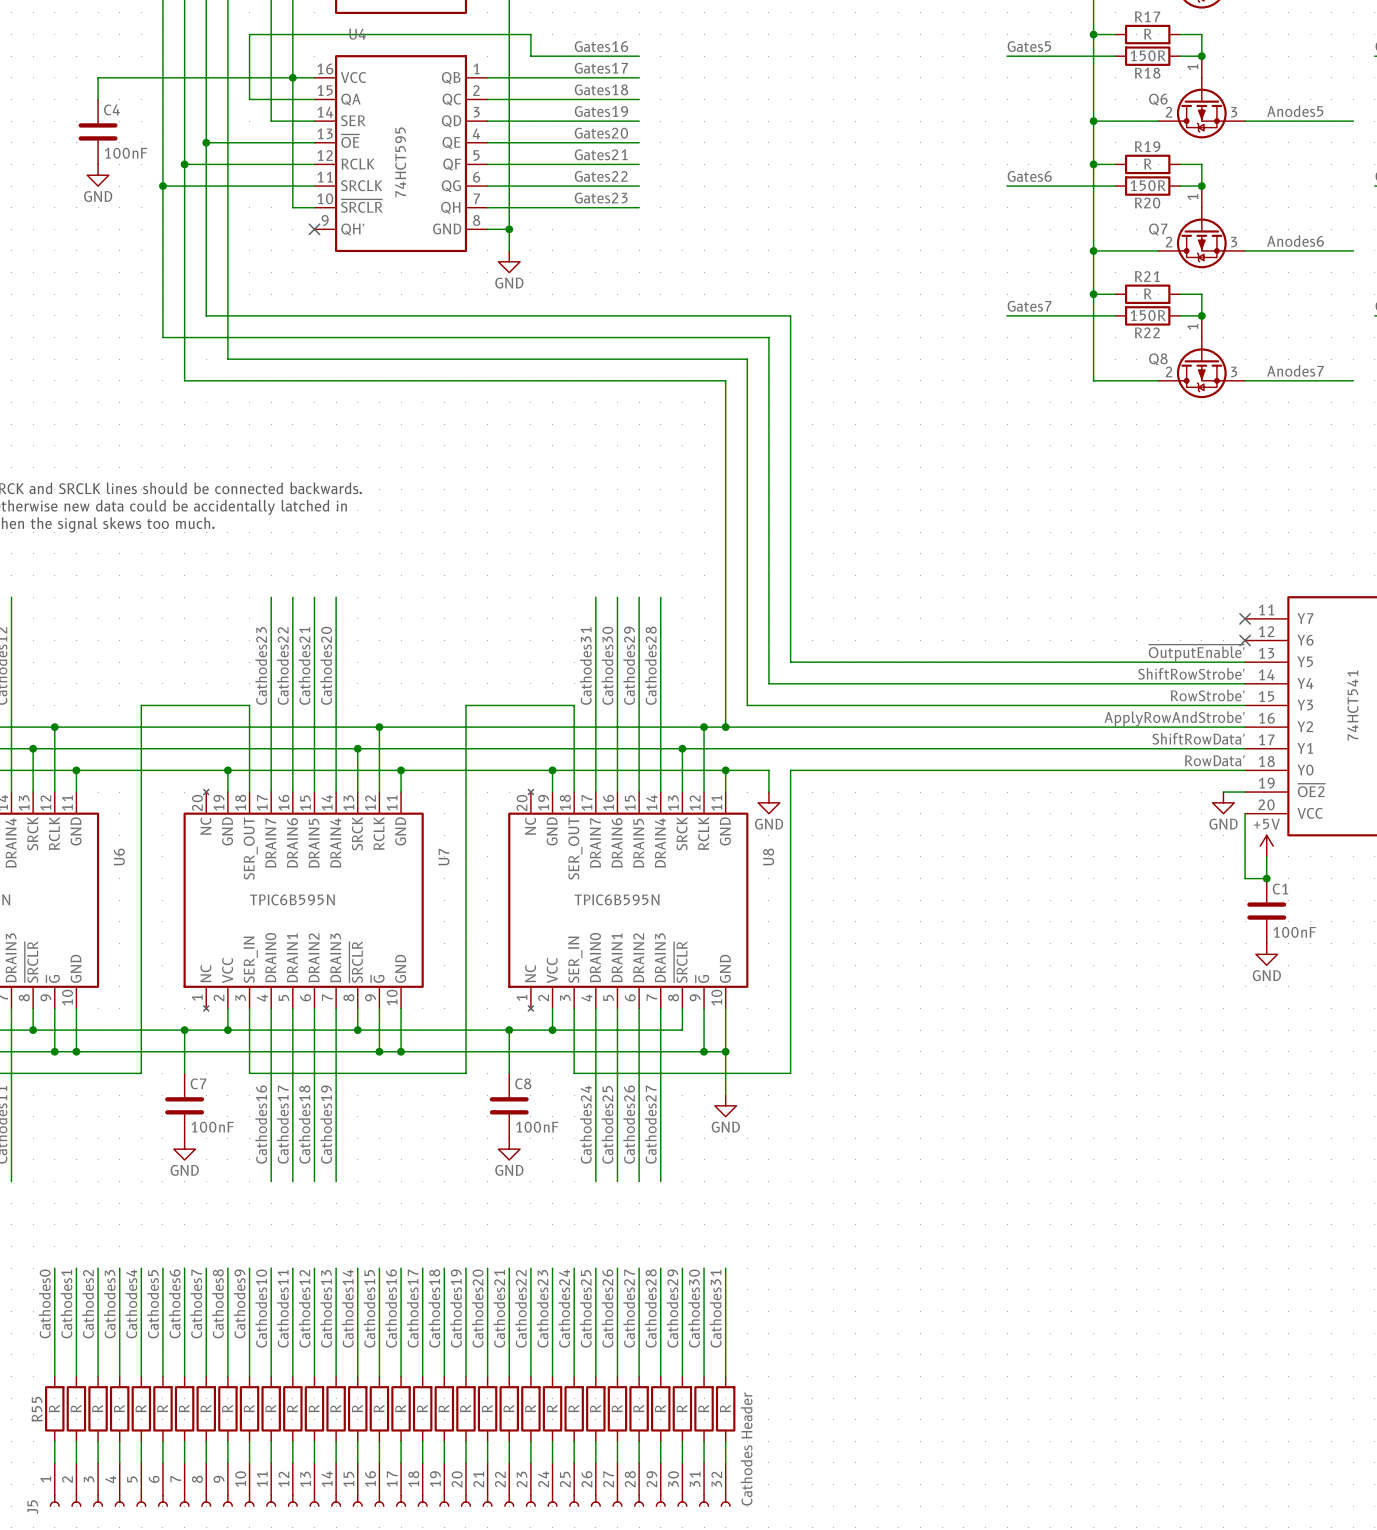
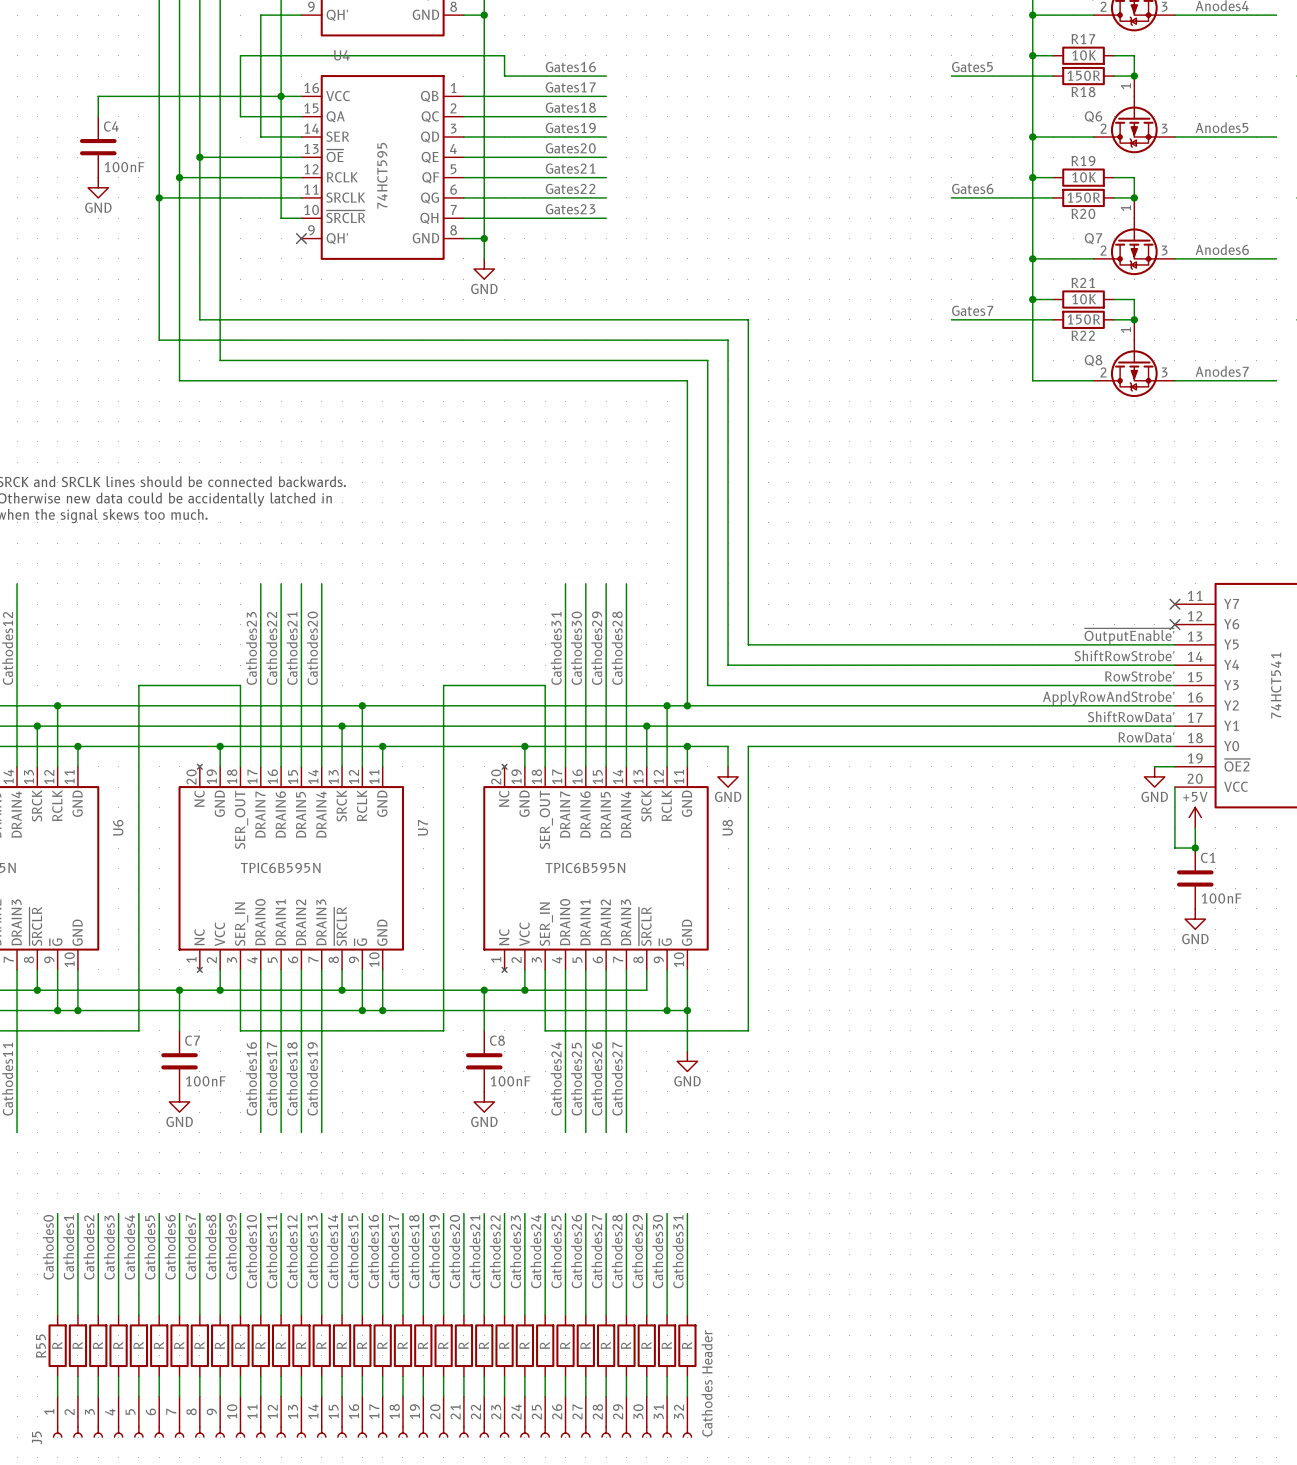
R17 value: R (1148, 34) -> 10K (1084, 55)
R19 value: R (1148, 164) -> 10K (1084, 177)
R21 value: R (1148, 293) -> 10K (1084, 299)

